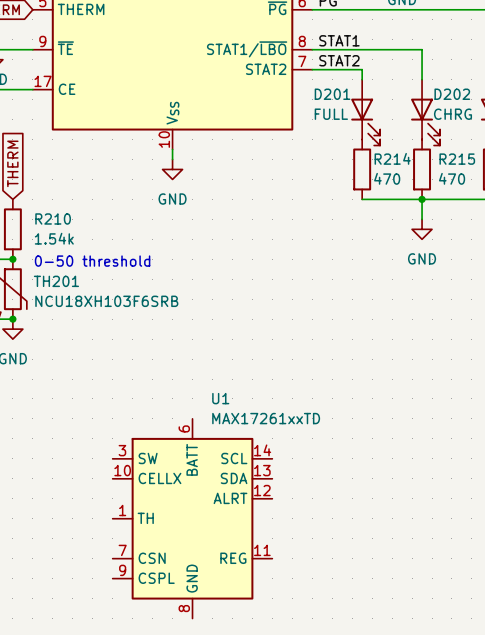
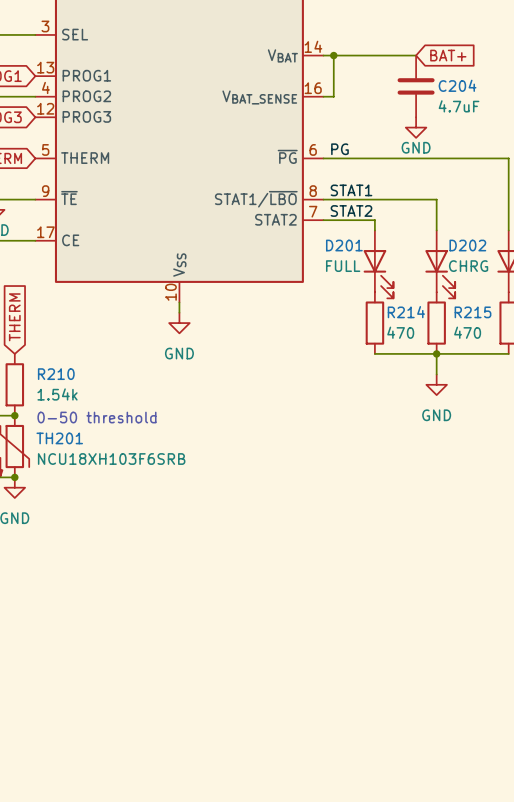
U1: MAX17261xxTD (192, 518) -> none

